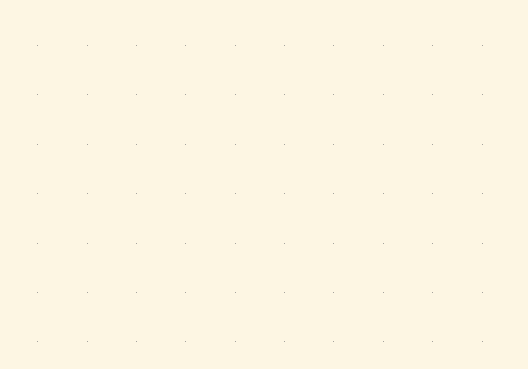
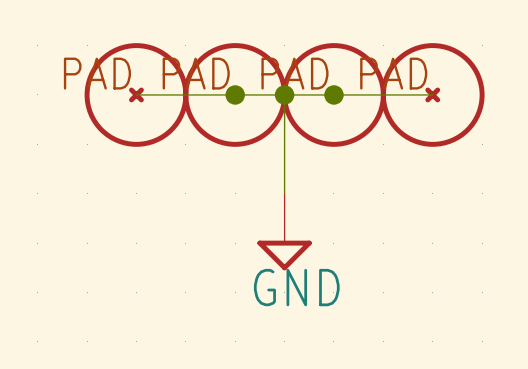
wire: none -> (136, 94) (432, 94)
part: none -> (136, 94)
part: none -> (235, 94)
junction: none -> (235, 94)
wire: none -> (284, 94) (284, 193)
junction: none -> (284, 94)
part: none -> (333, 94)
junction: none -> (333, 94)
part: none -> (432, 94)
power symbol: none -> GND (284, 232)

